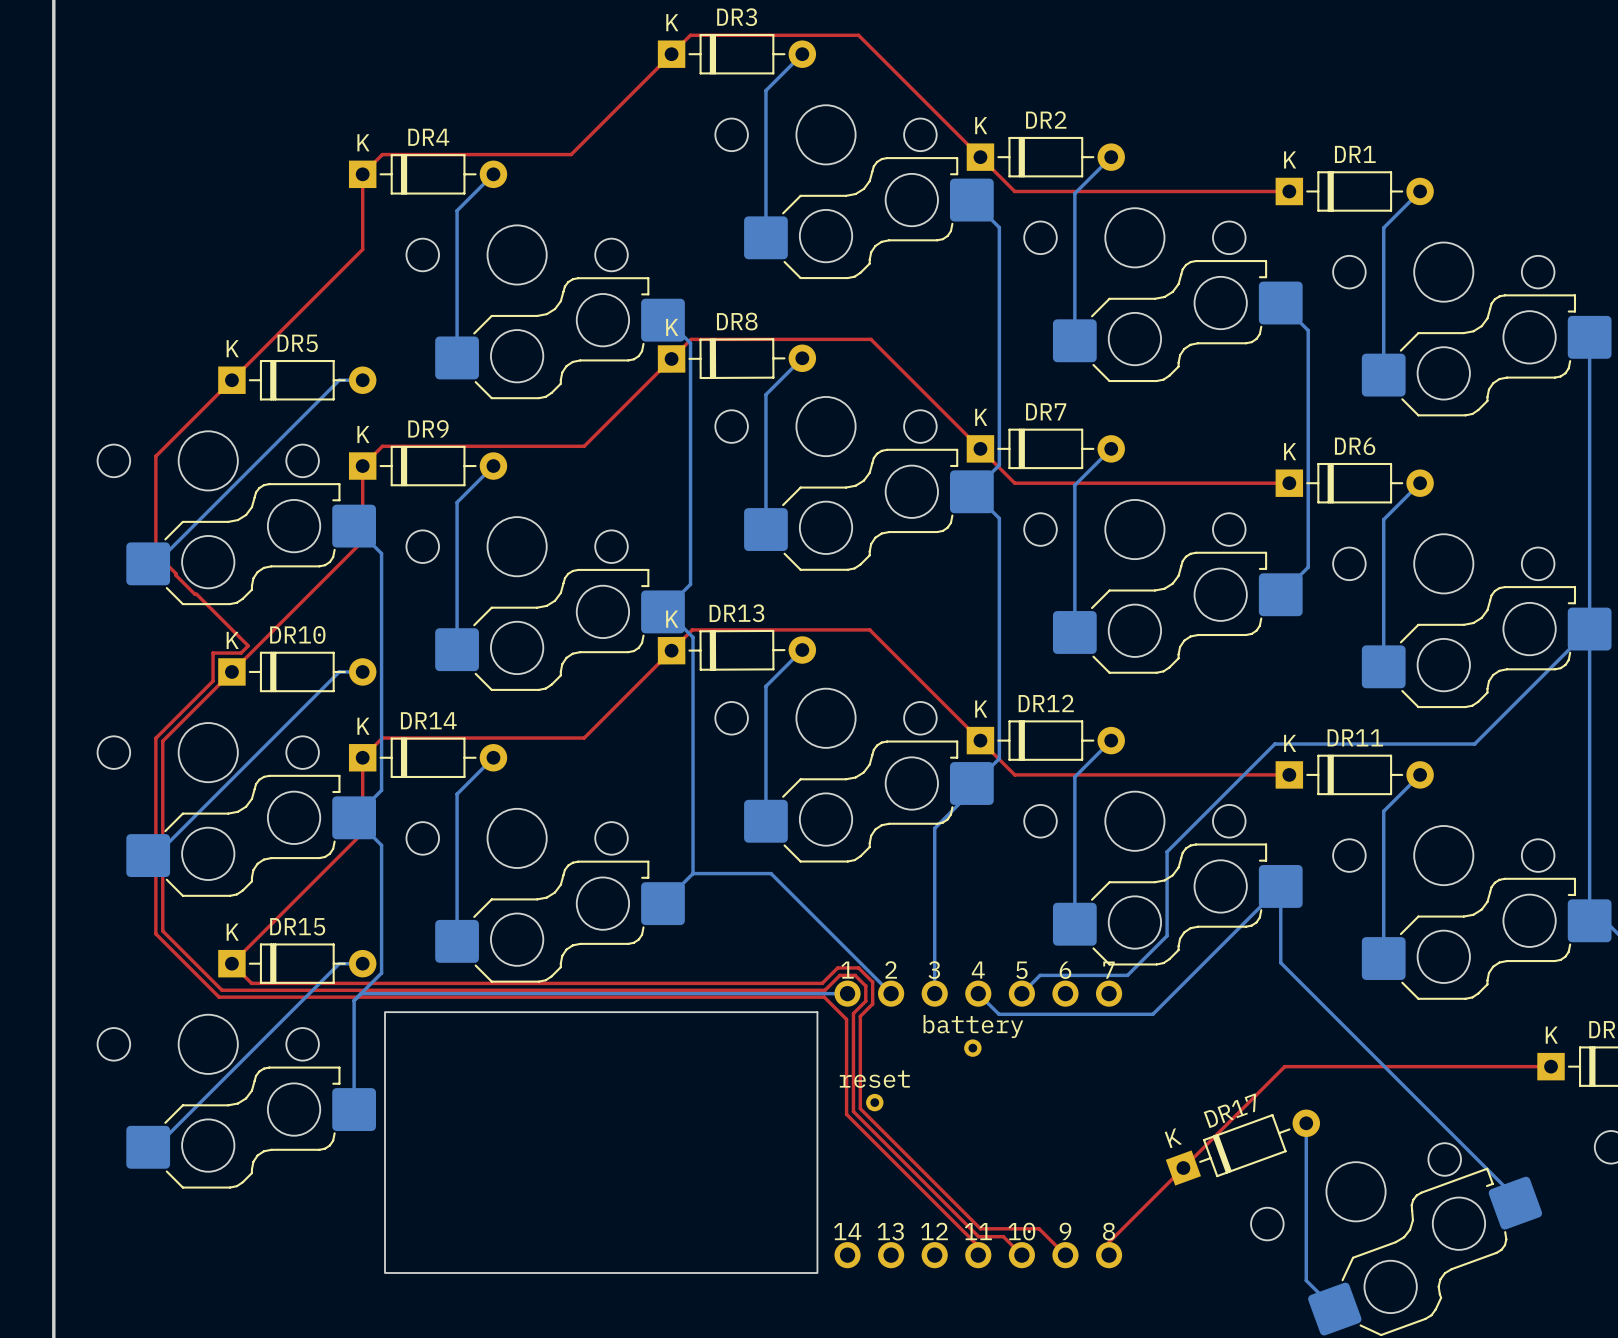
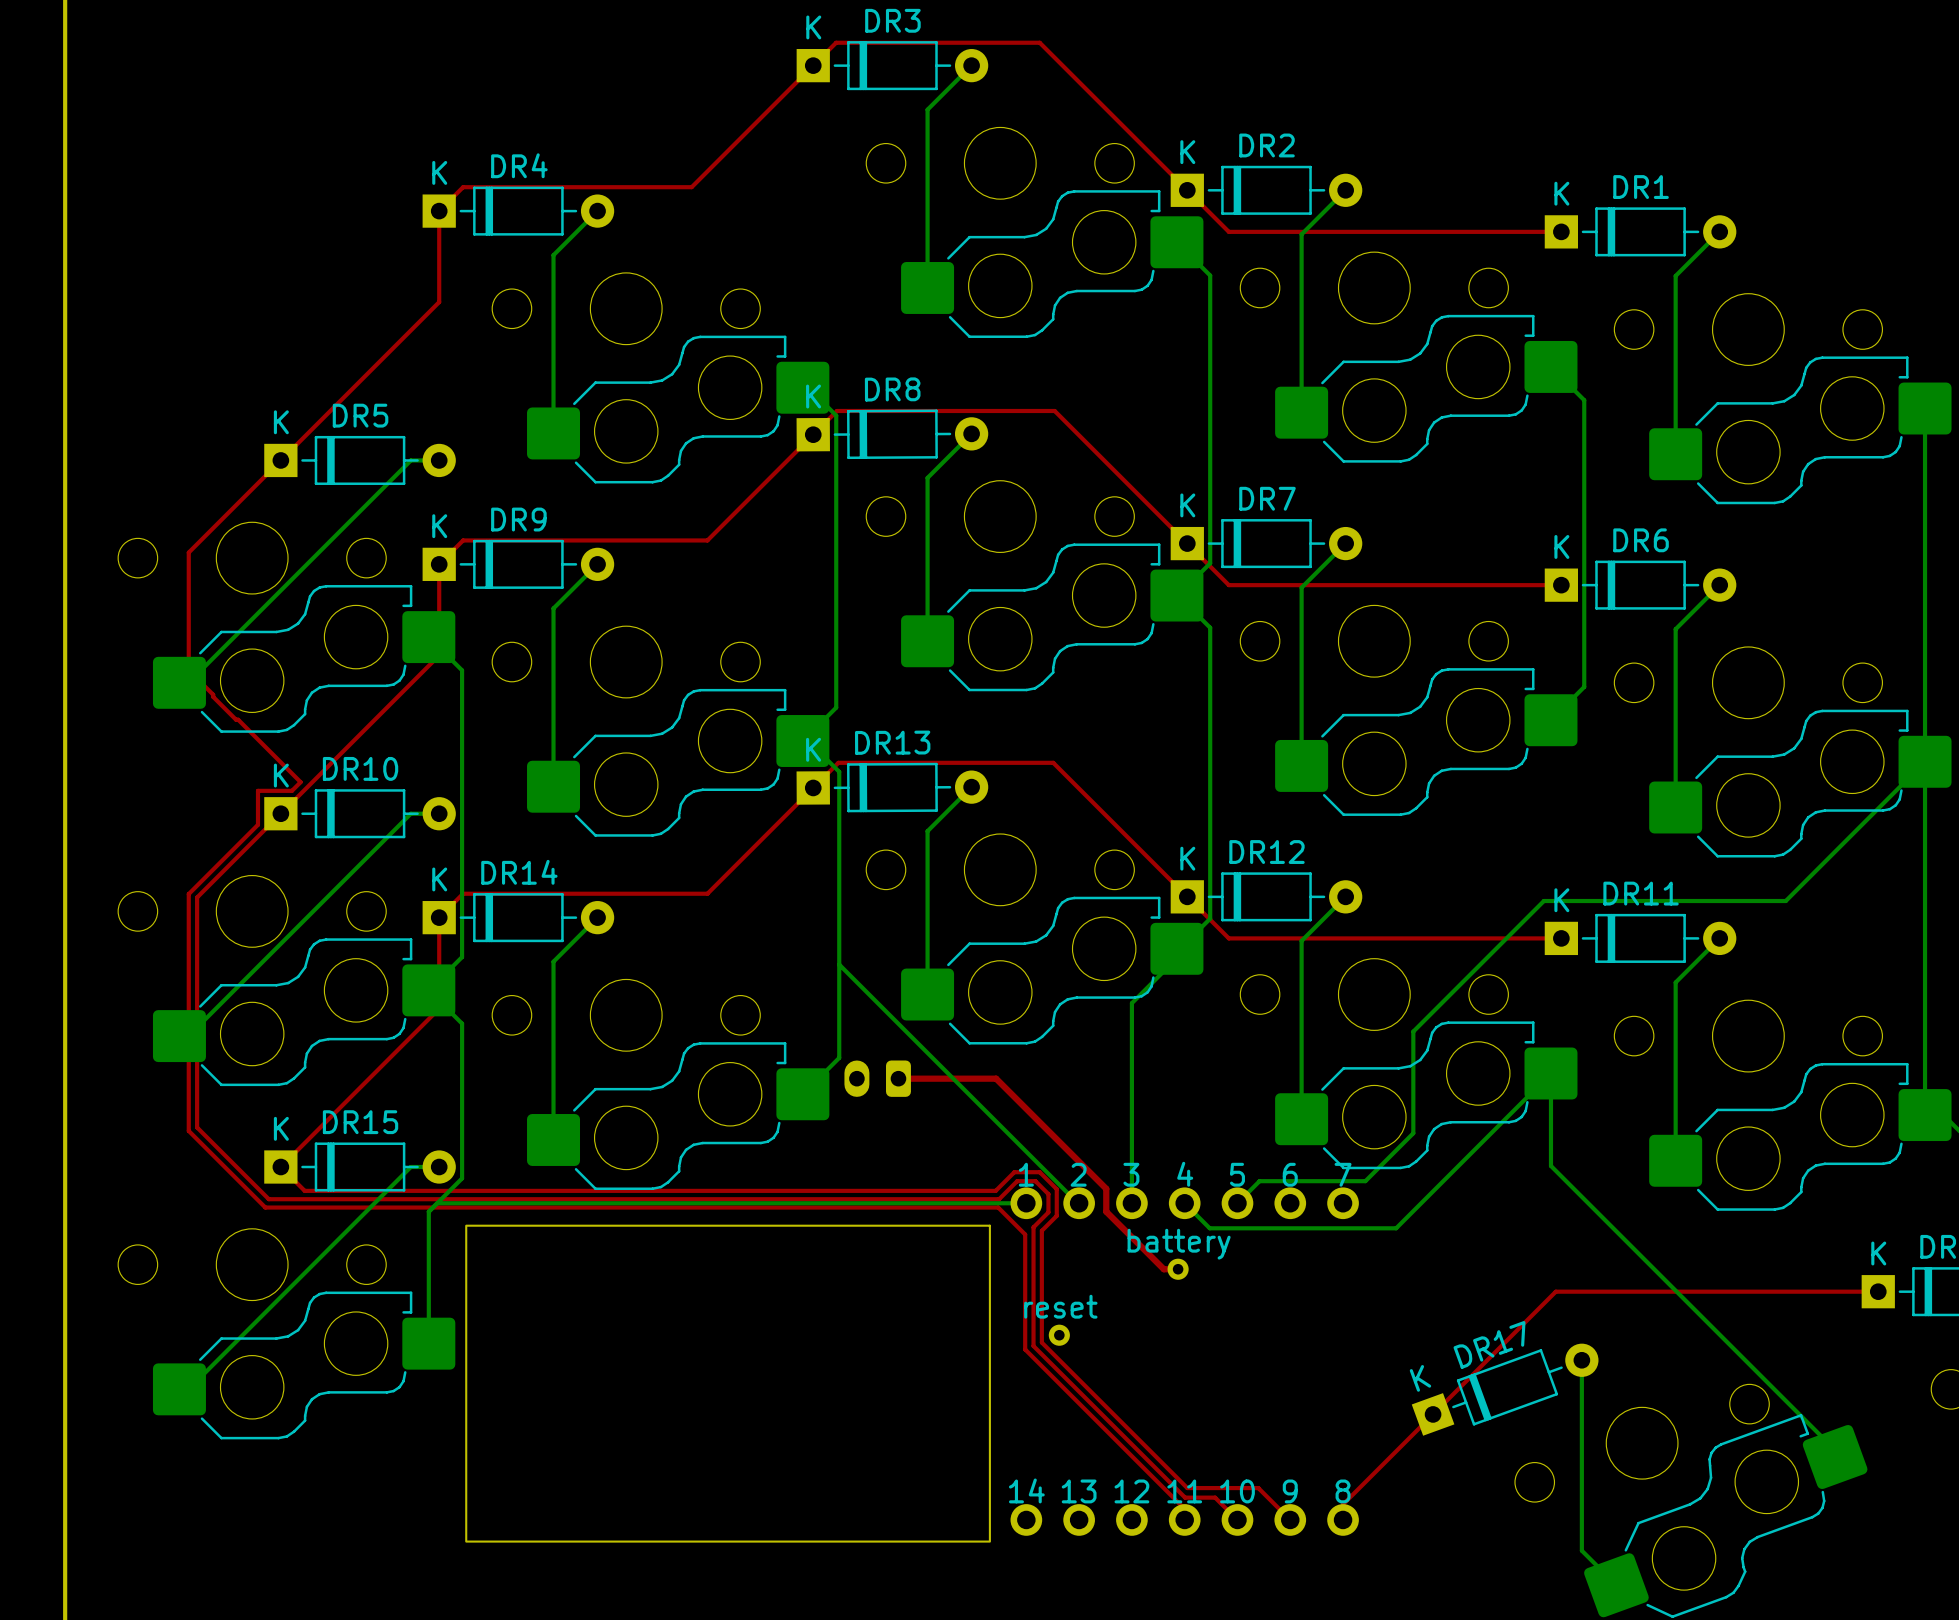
bottom track: (693, 873) (771, 873) (891, 993) -> (839, 964) (1079, 1203)
part: none -> (877, 1078)
top track: none -> (898, 1078) (996, 1078) (1106, 1188) (1106, 1211) (1163, 1269) (1178, 1269)

